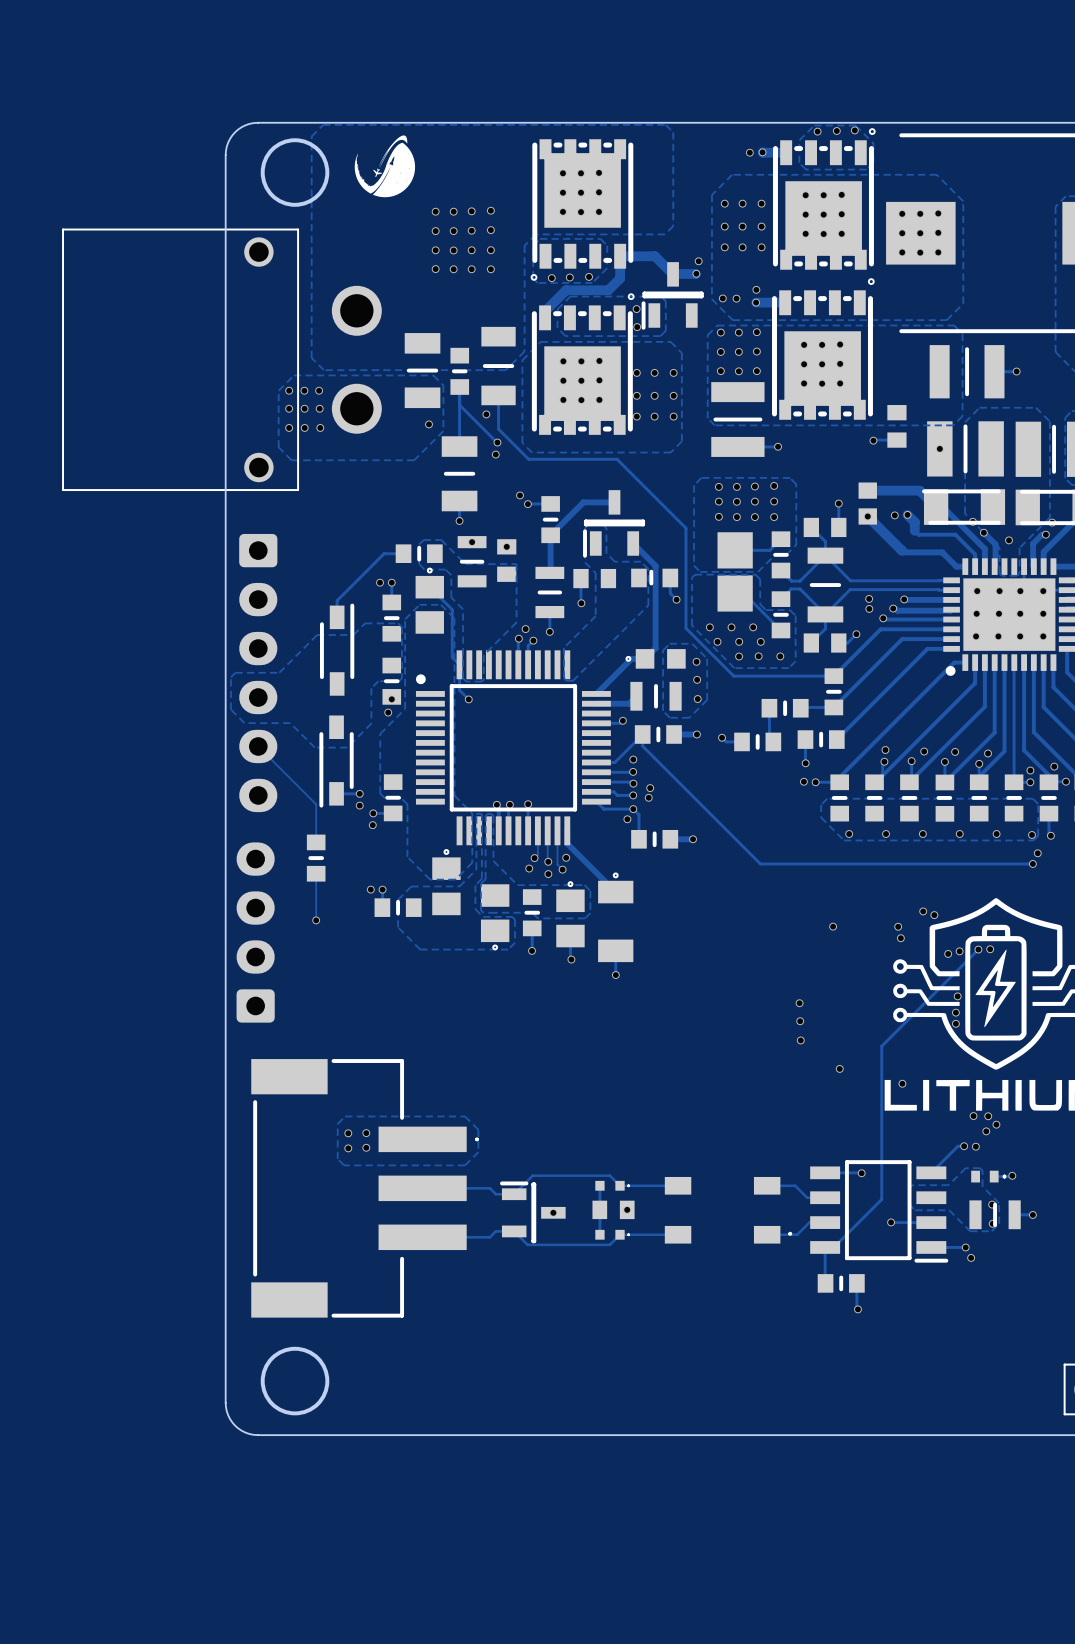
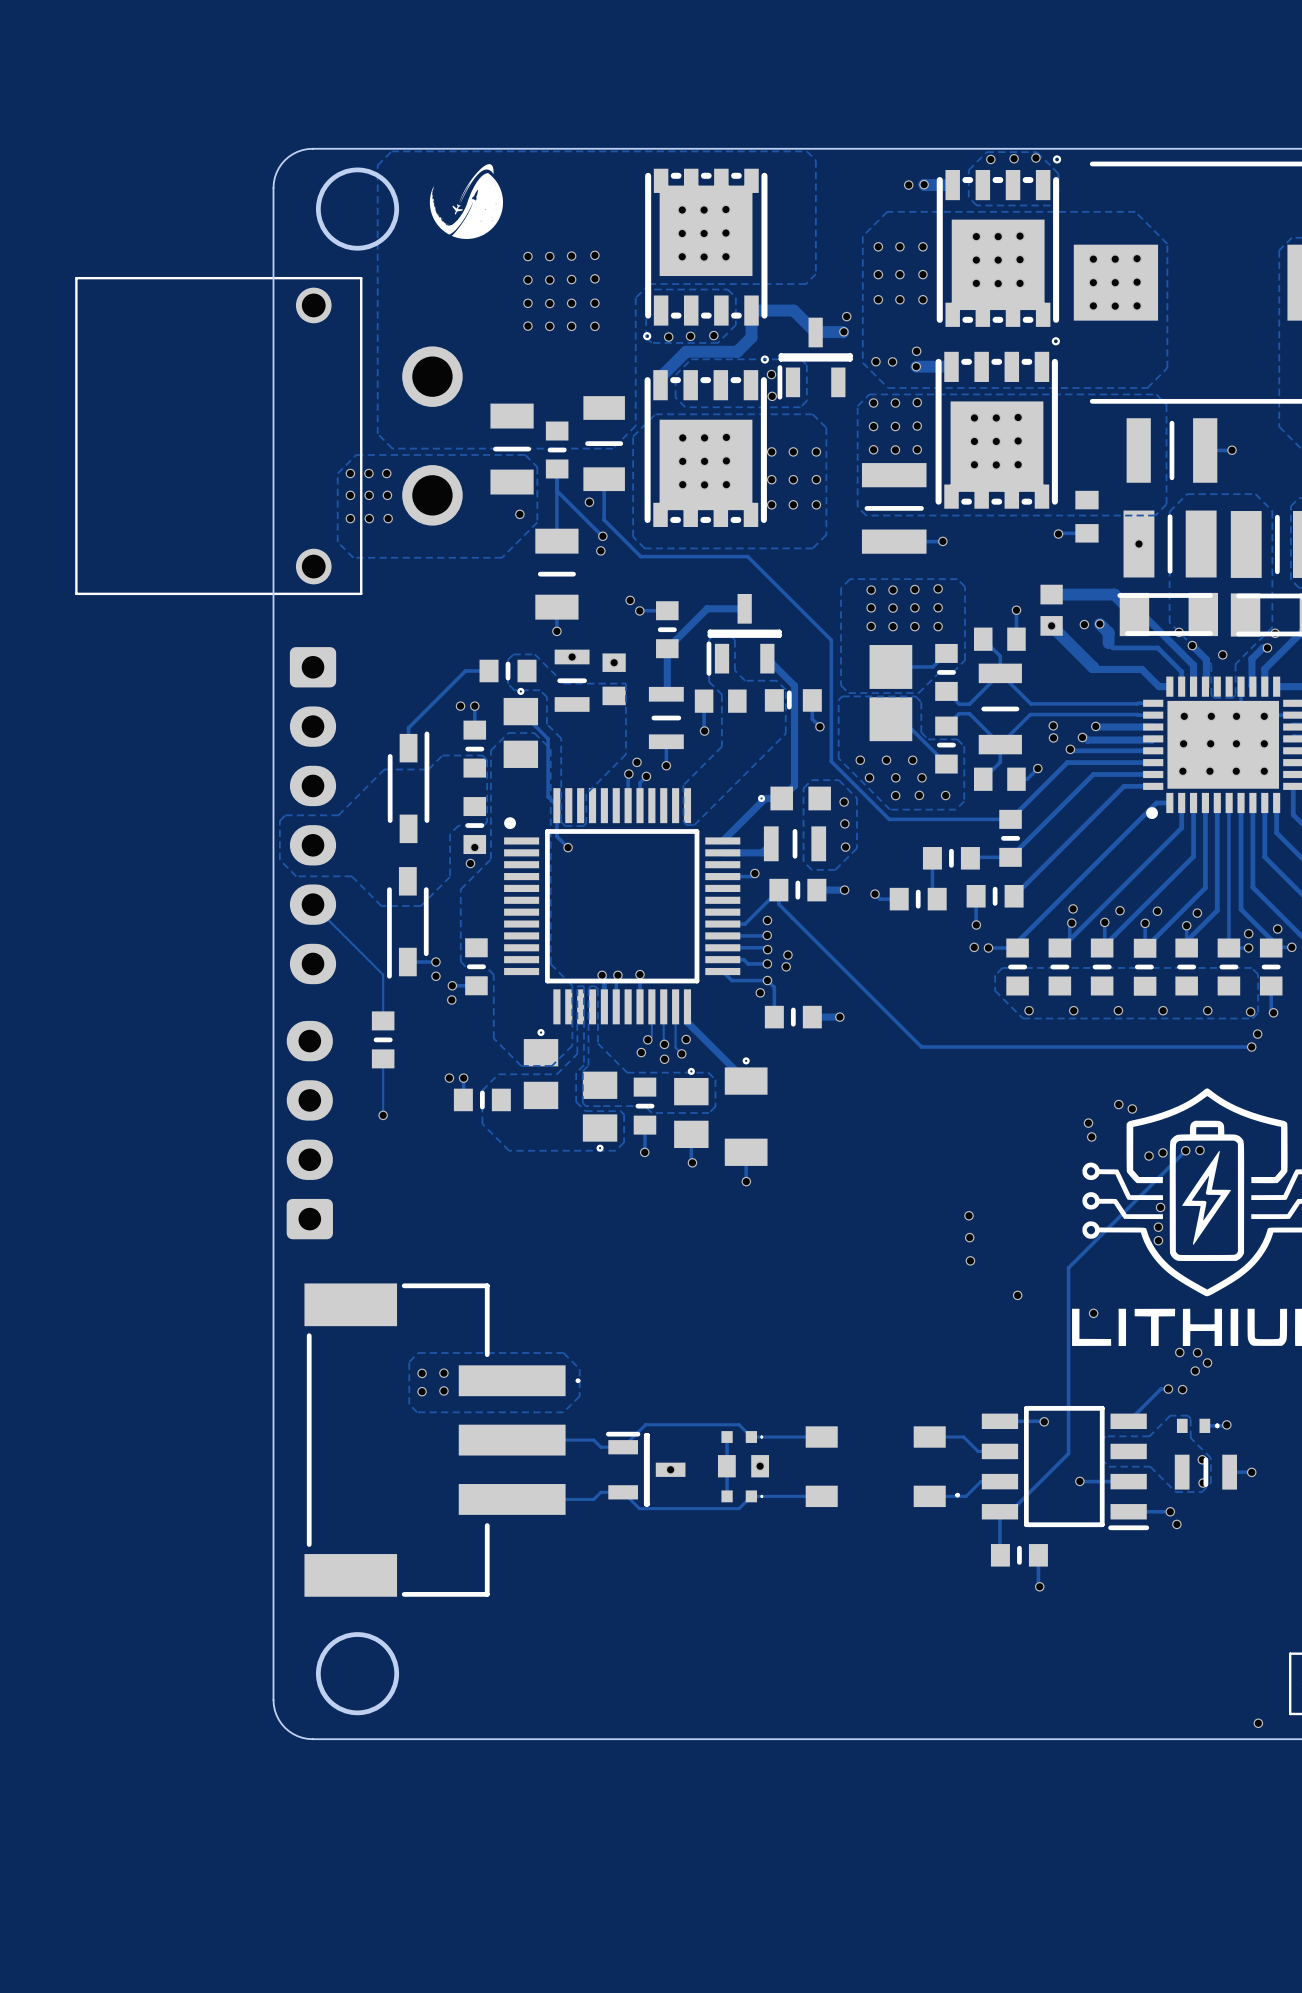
via: (833, 926) -> none
via: none -> (1258, 1723)

